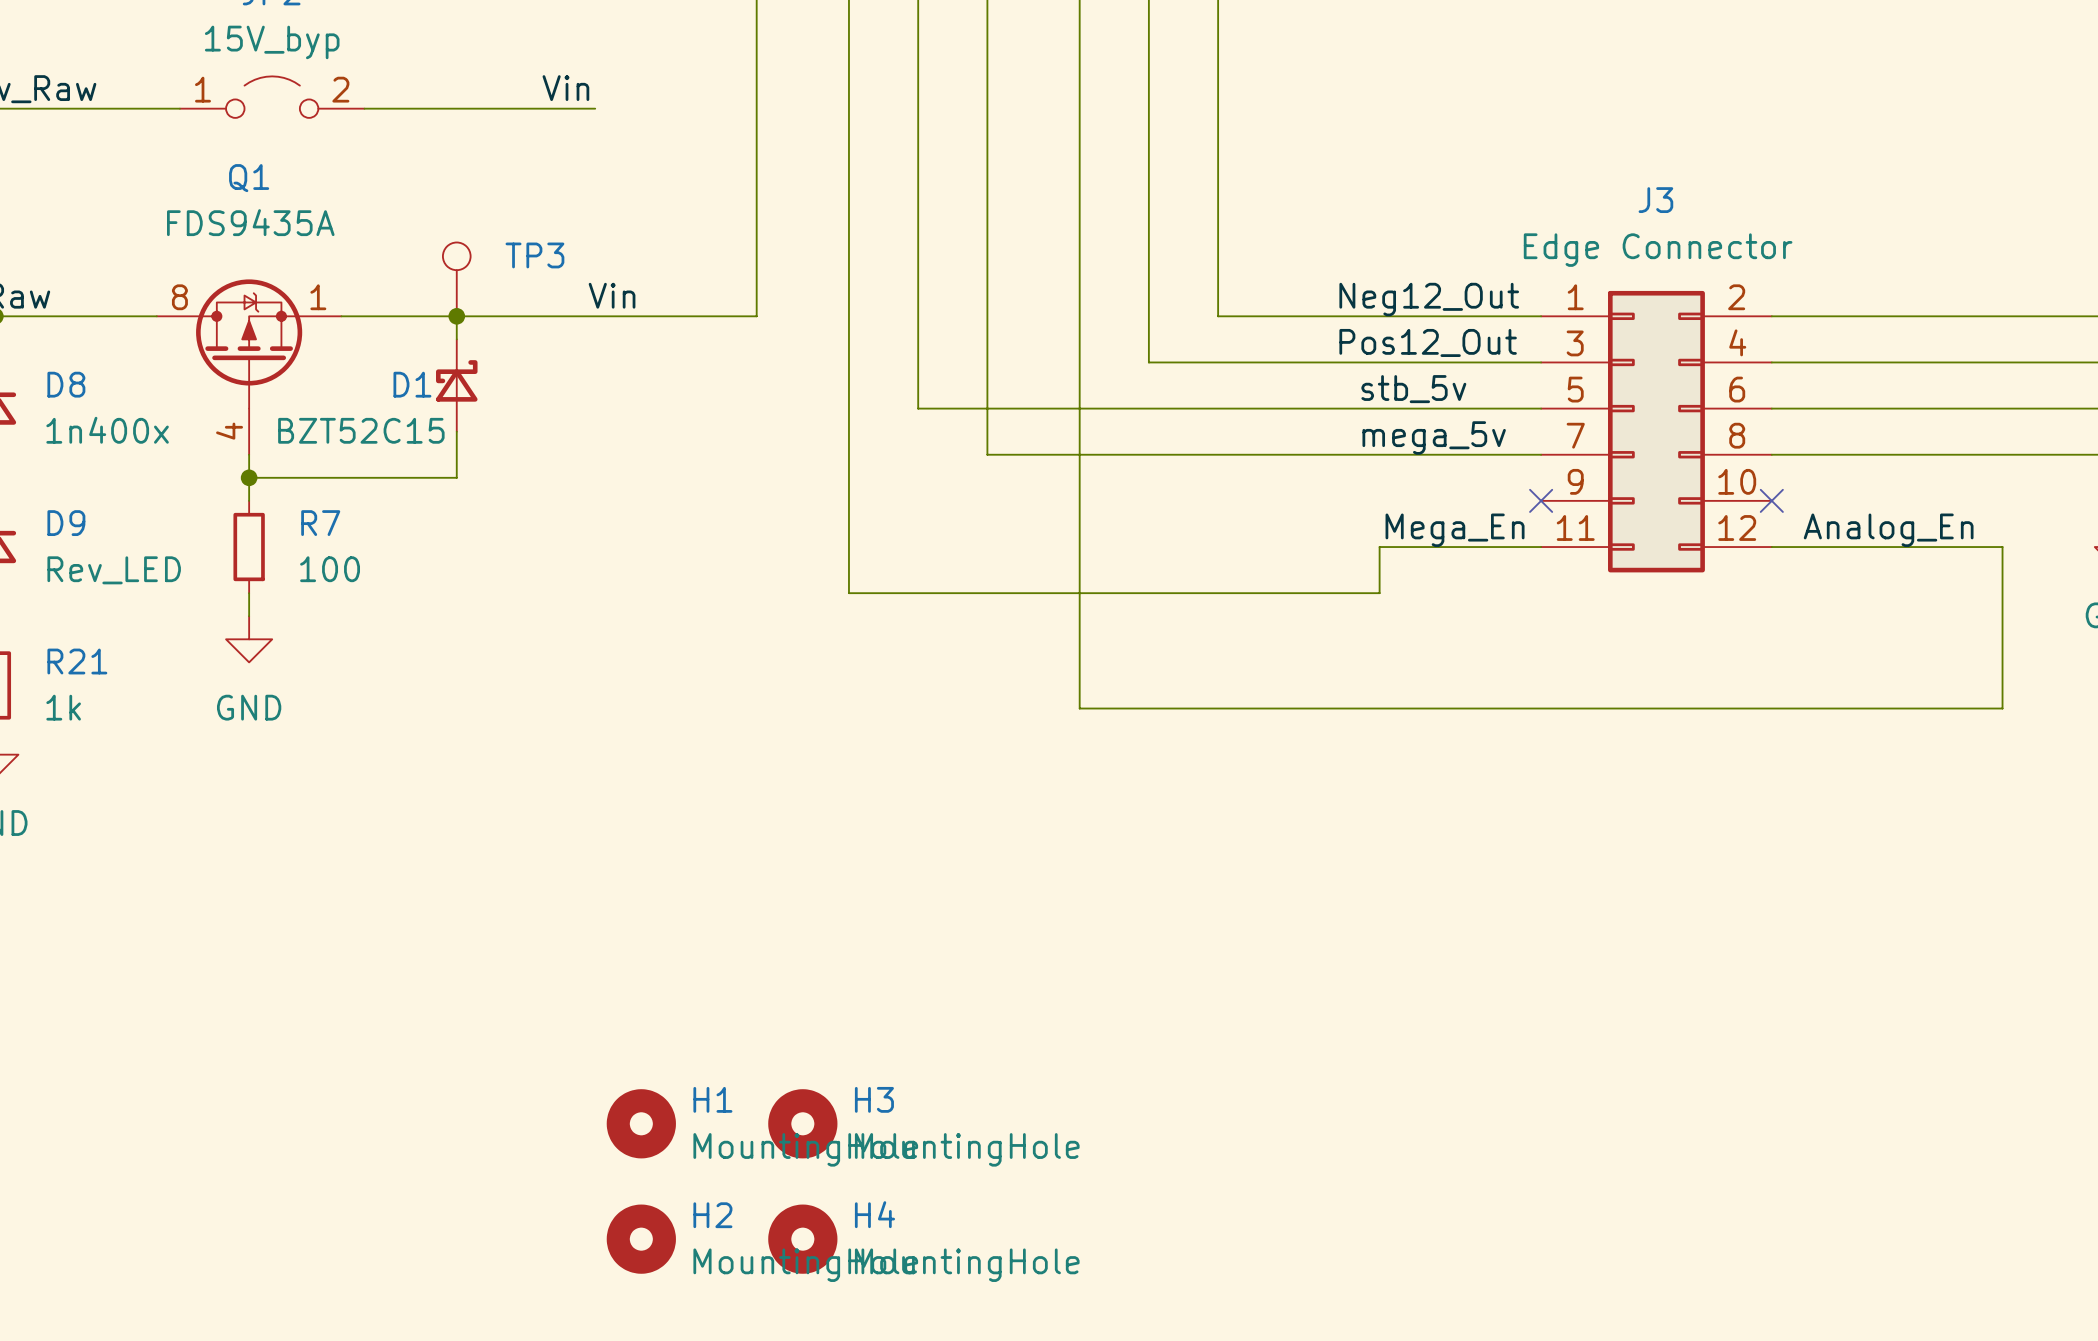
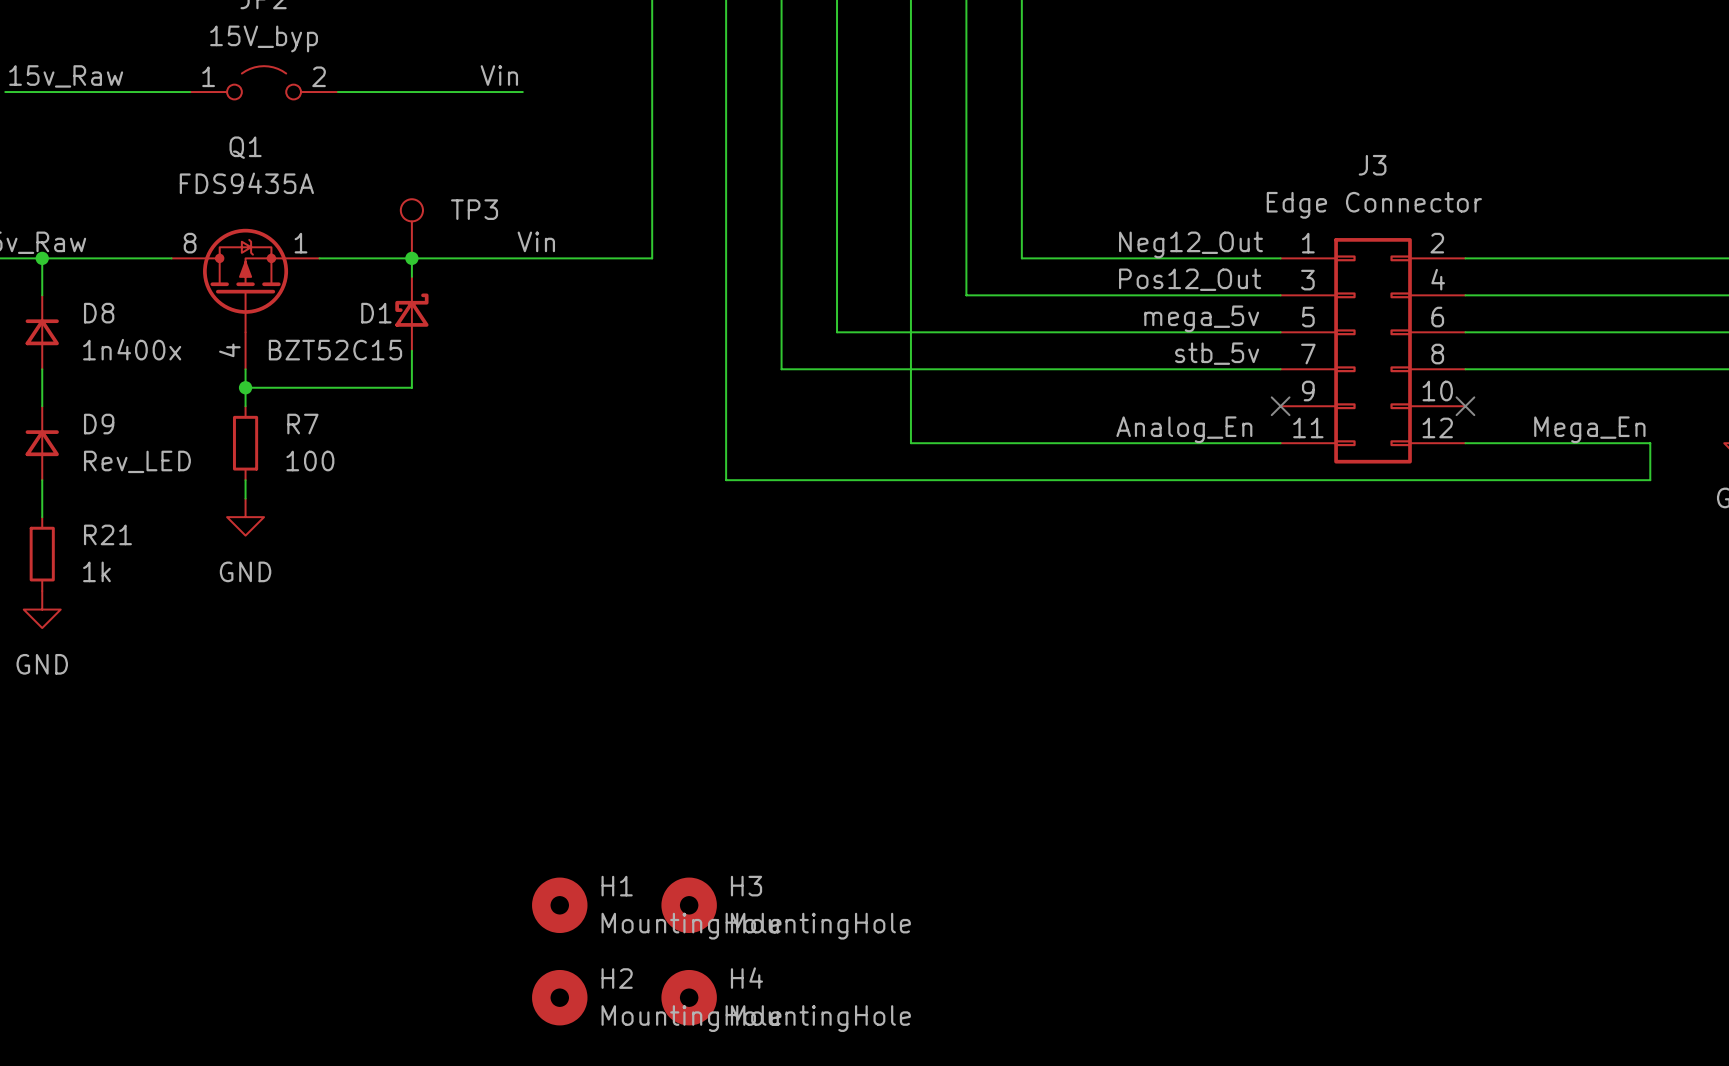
label position: stb_5v (1413, 389) -> stb_5v (1217, 353)
wire: (918, 408) (987, 408) (987, 454) -> (781, 332) (781, 369) (837, 369)
label position: mega_5v (1434, 437) -> mega_5v (1201, 318)
label: none -> Analog_En (1184, 429)
label: Mega_En (1455, 530) -> none
label: Analog_En (1888, 530) -> none
label: none -> Mega_En (1589, 429)
wire: (1079, 547) (1079, 708) (2002, 708) (2002, 593) -> (1151, 480) (1650, 480)
wire: (1379, 547) (1379, 593) -> (1151, 443) (910, 443)

